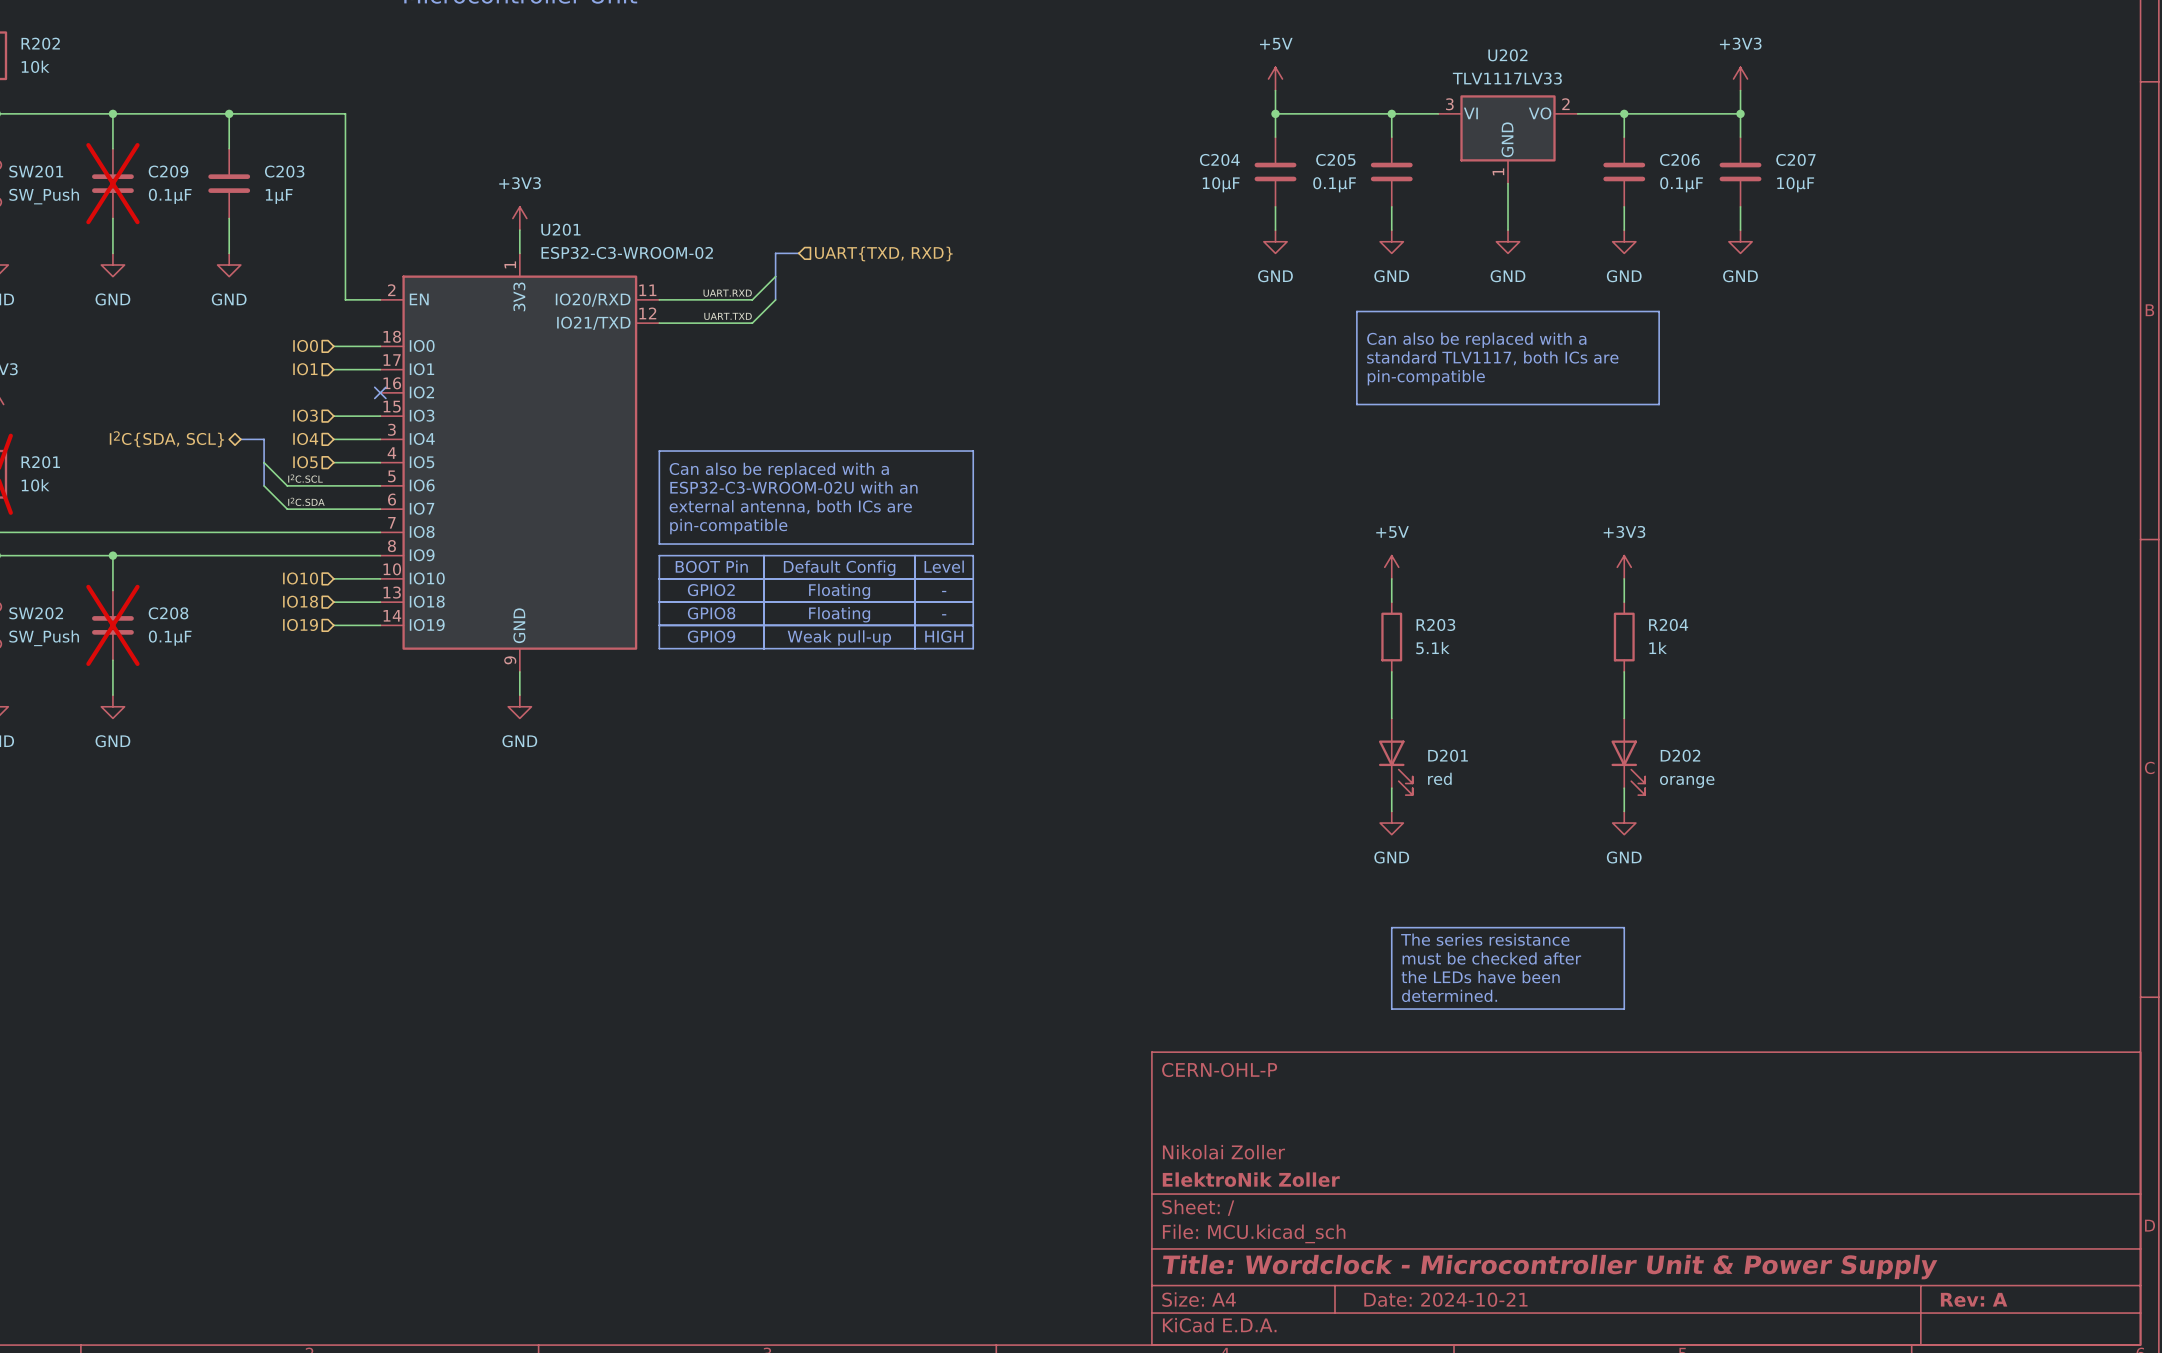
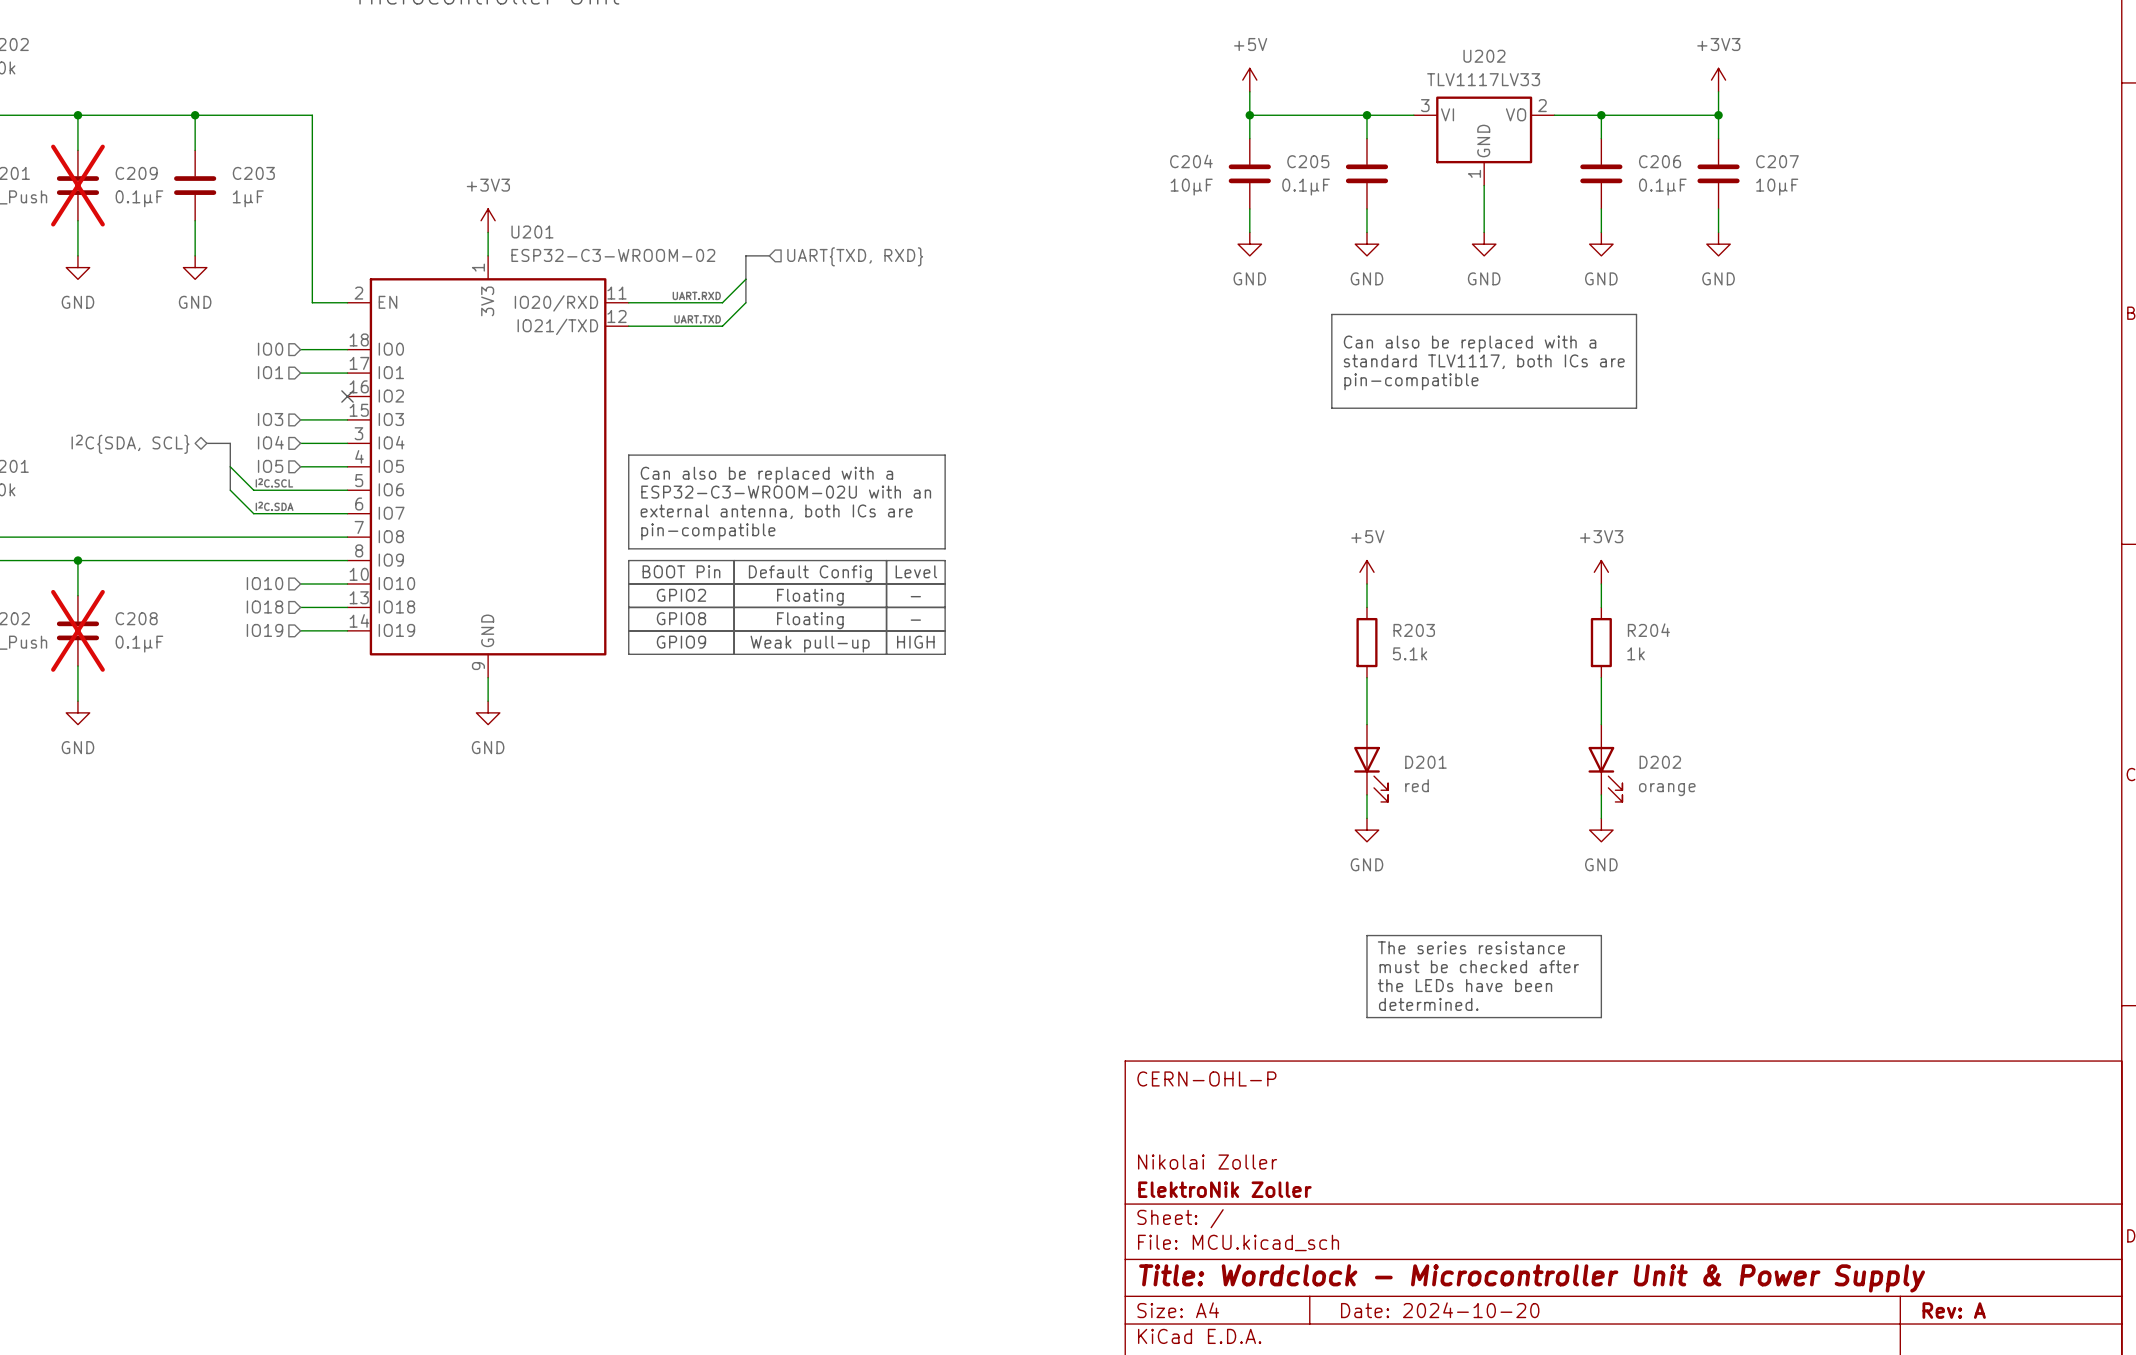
title block: Date: 2024-10-21 (1445, 1299) -> Date: 2024-10-20 (1440, 1310)

